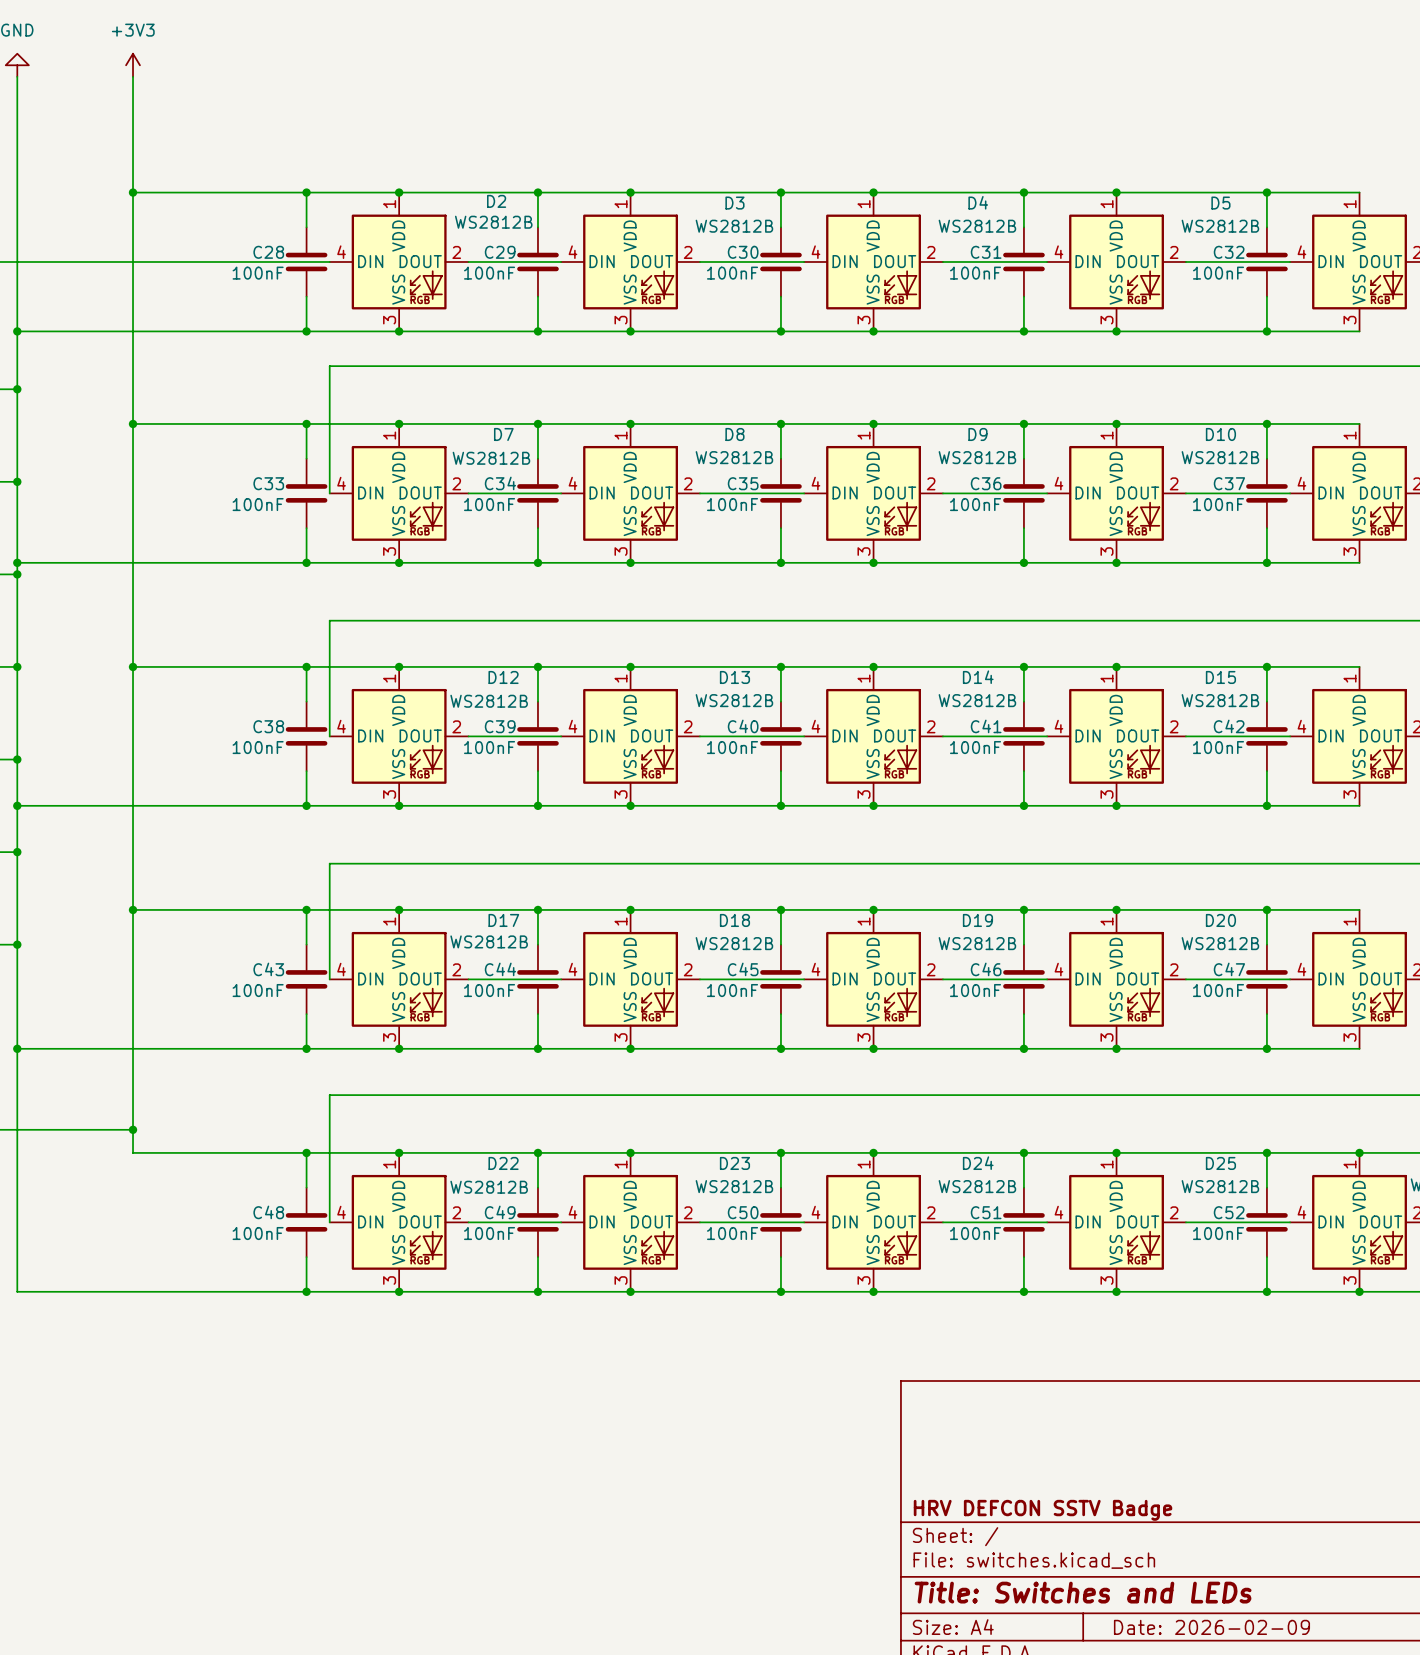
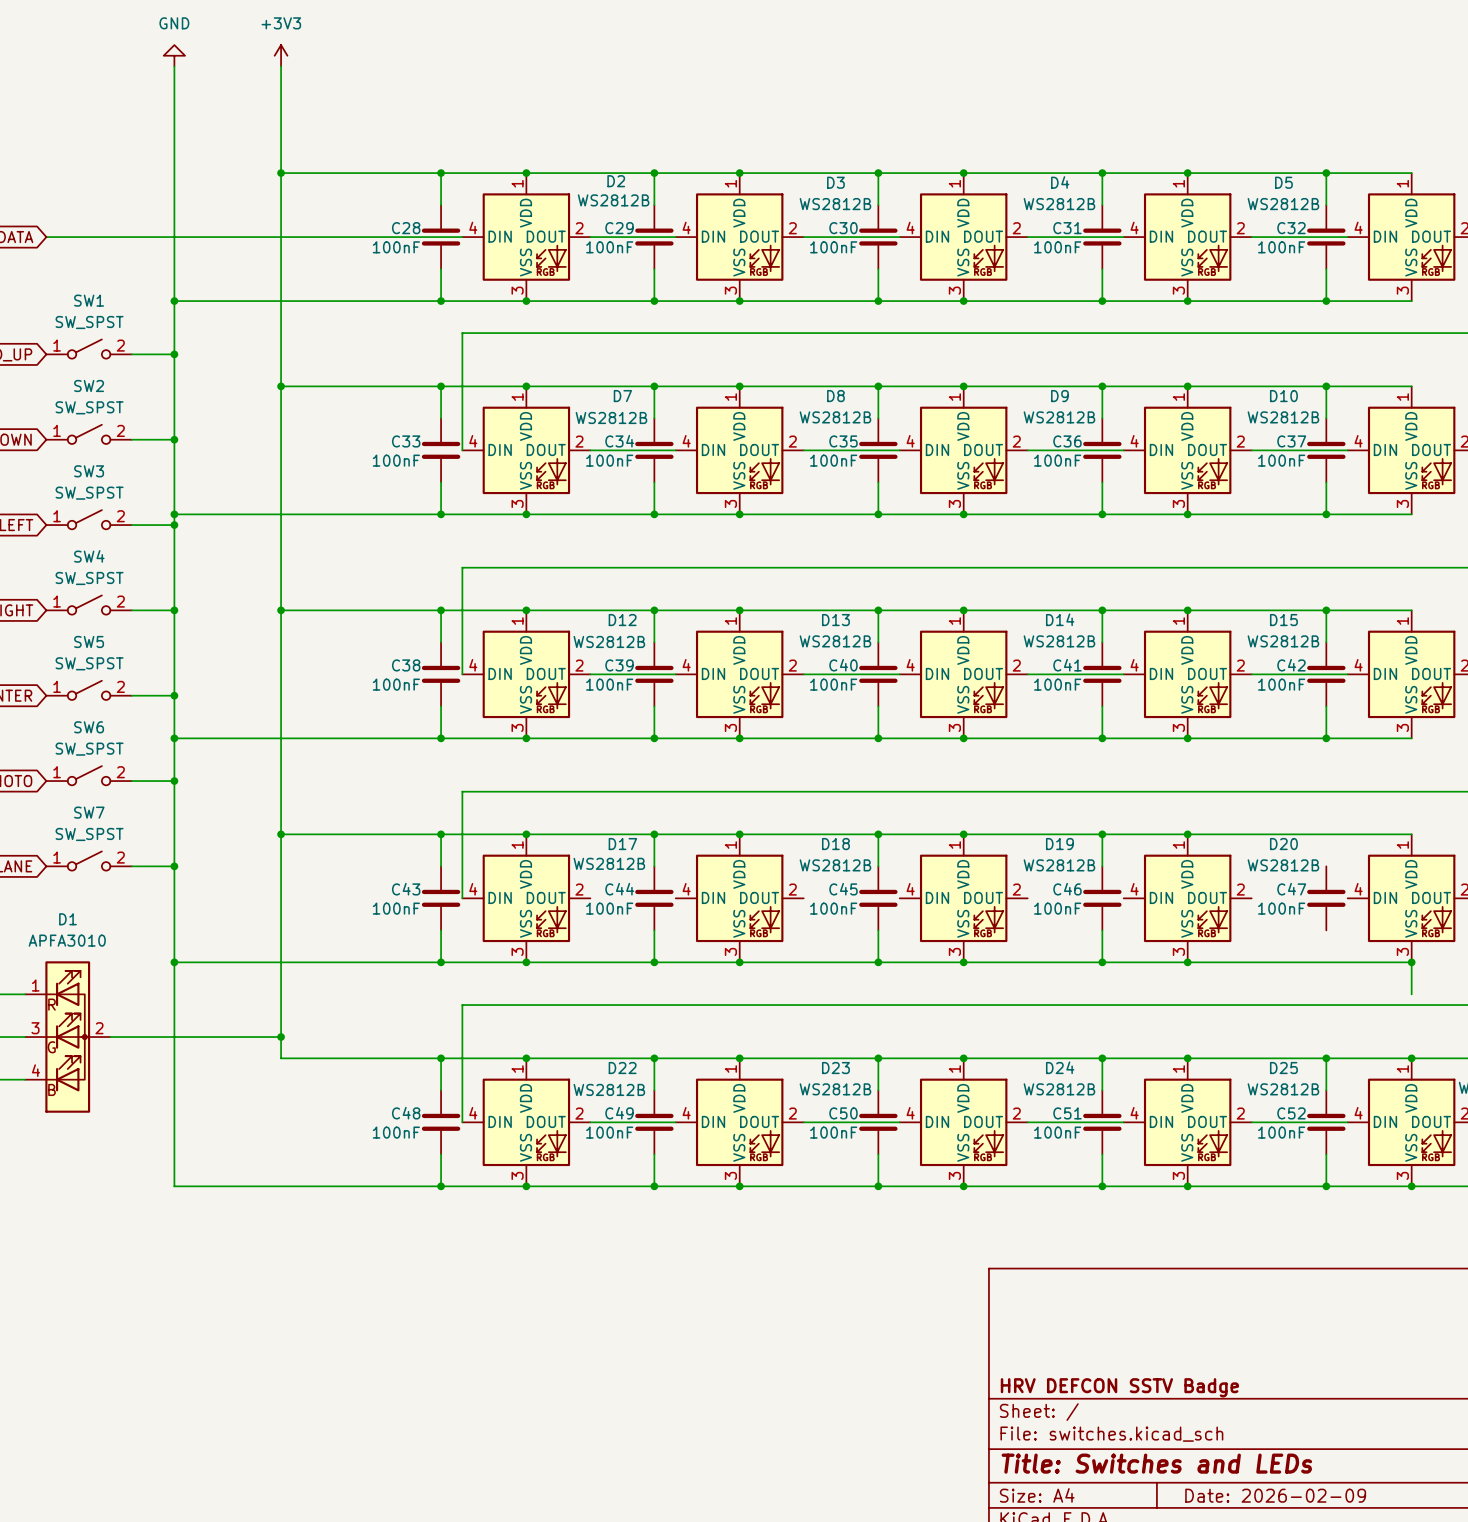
wire: (1266, 909) (1266, 944) -> none
junction: (1266, 909) -> none
wire: (468, 979) (561, 979) -> none
wire: (699, 979) (804, 979) -> none
wire: (942, 979) (1047, 979) -> none
wire: (1185, 979) (1290, 979) -> none
wire: (1266, 1014) (1266, 1048) -> (1411, 962) (1411, 994)
junction: (1266, 1048) -> none
junction: none -> (1411, 962)

